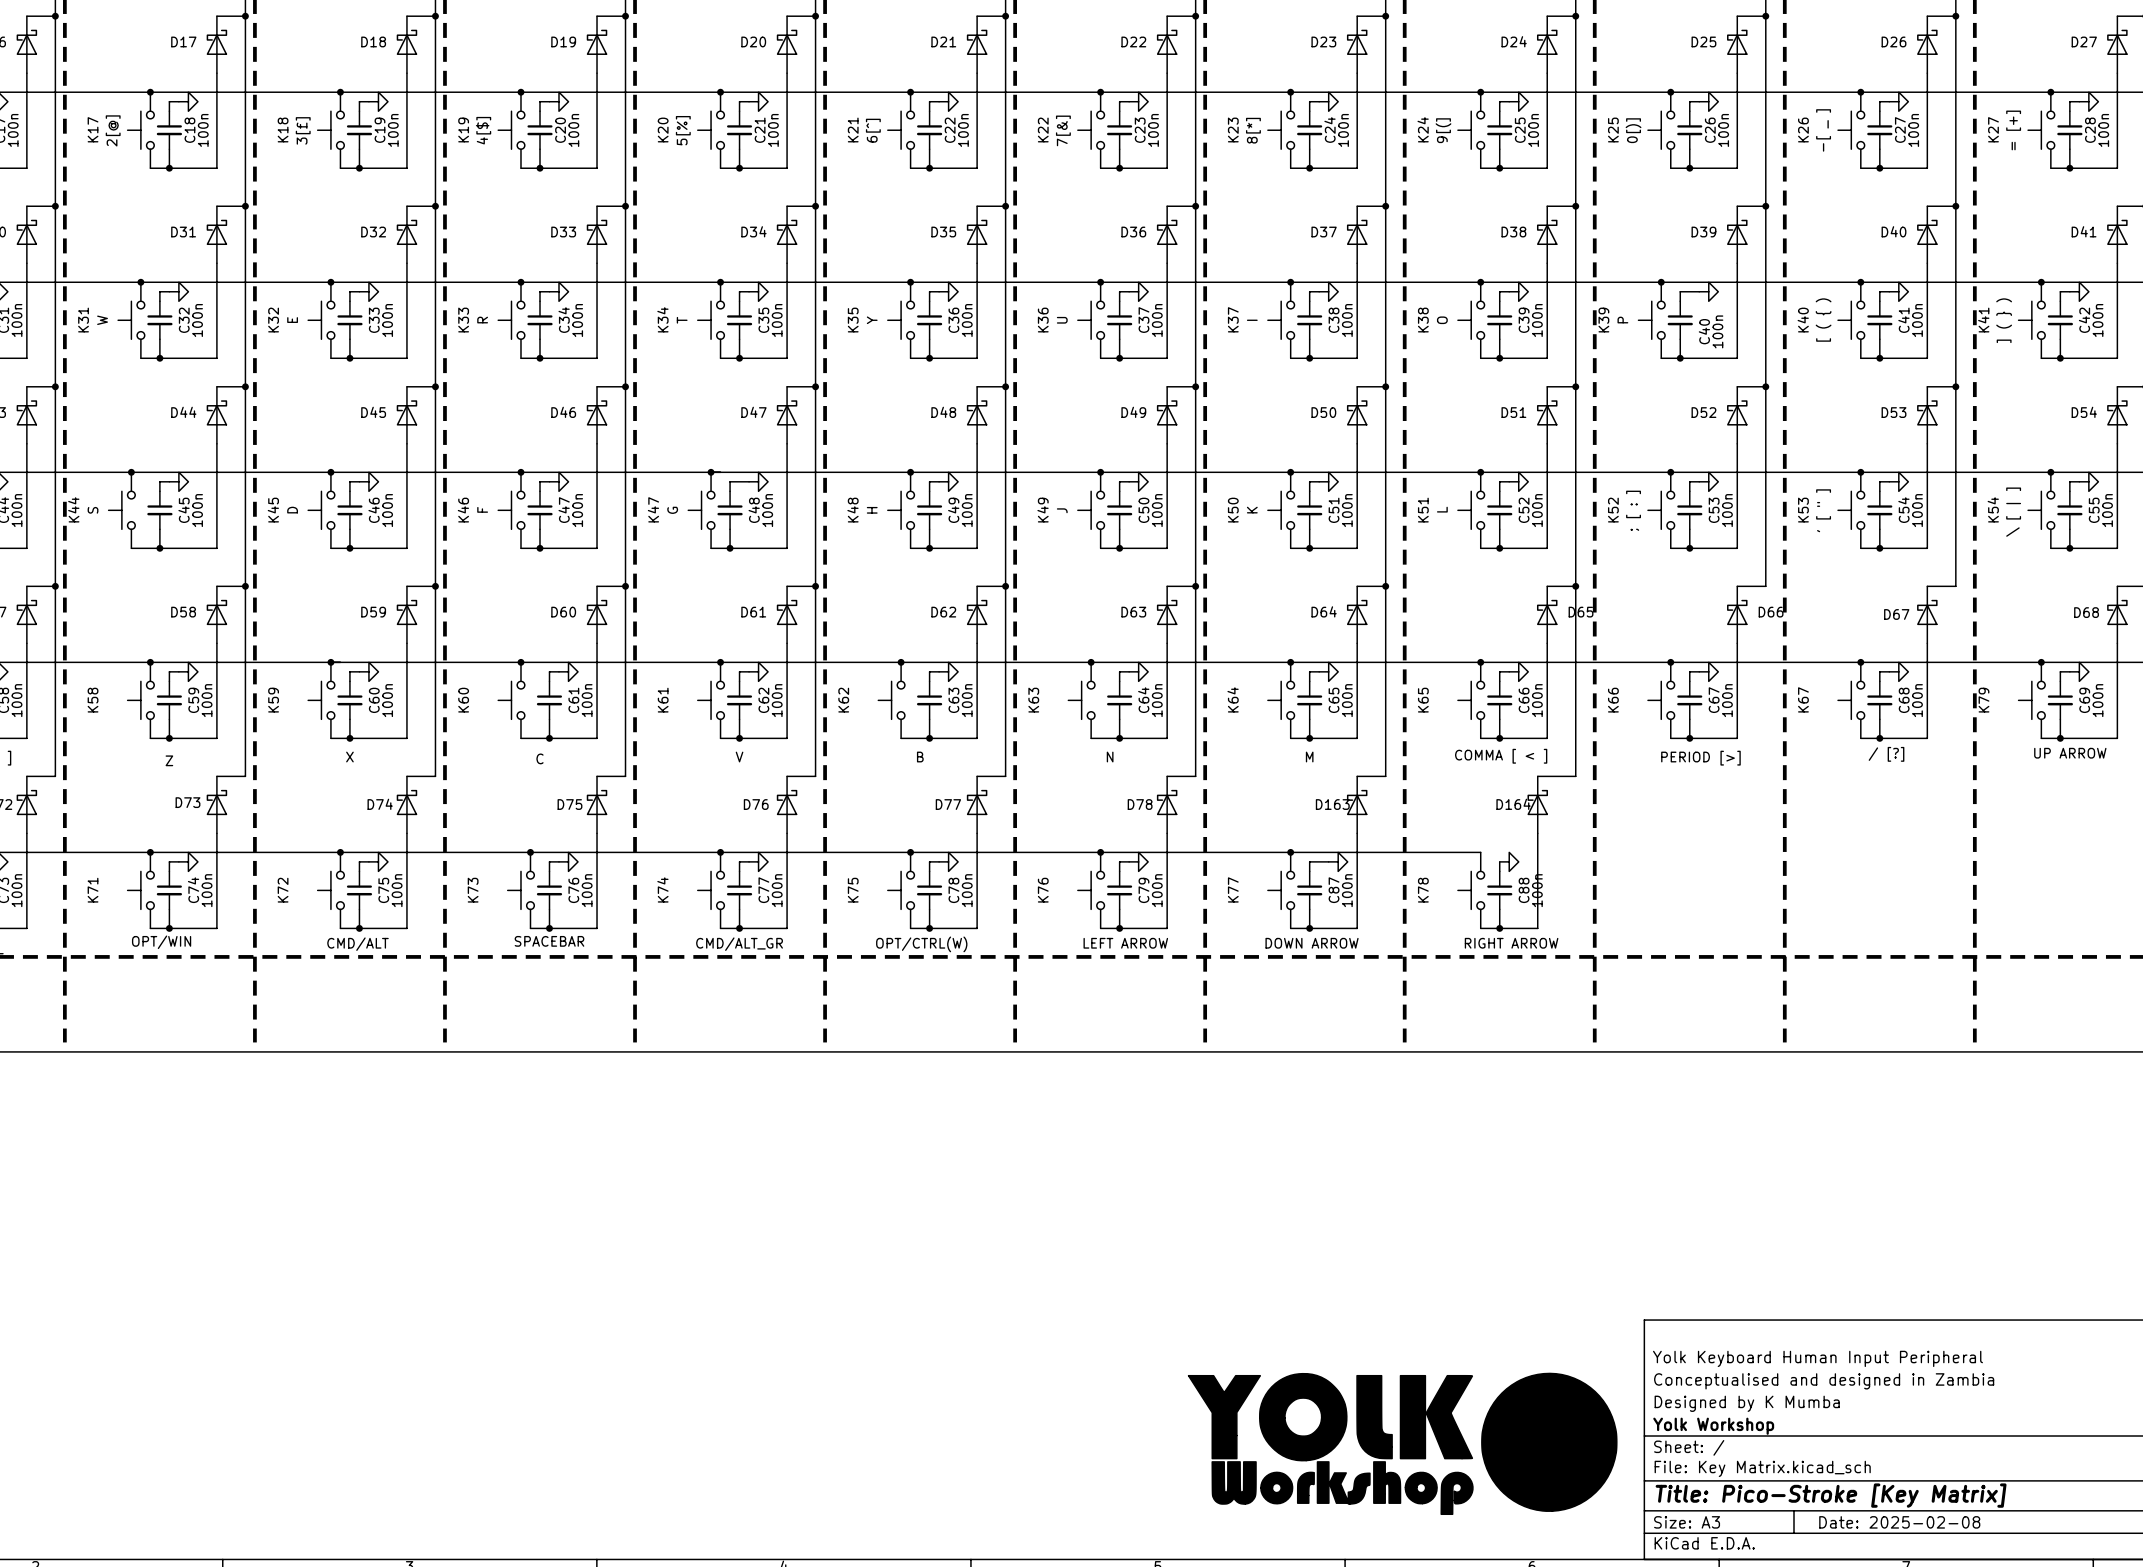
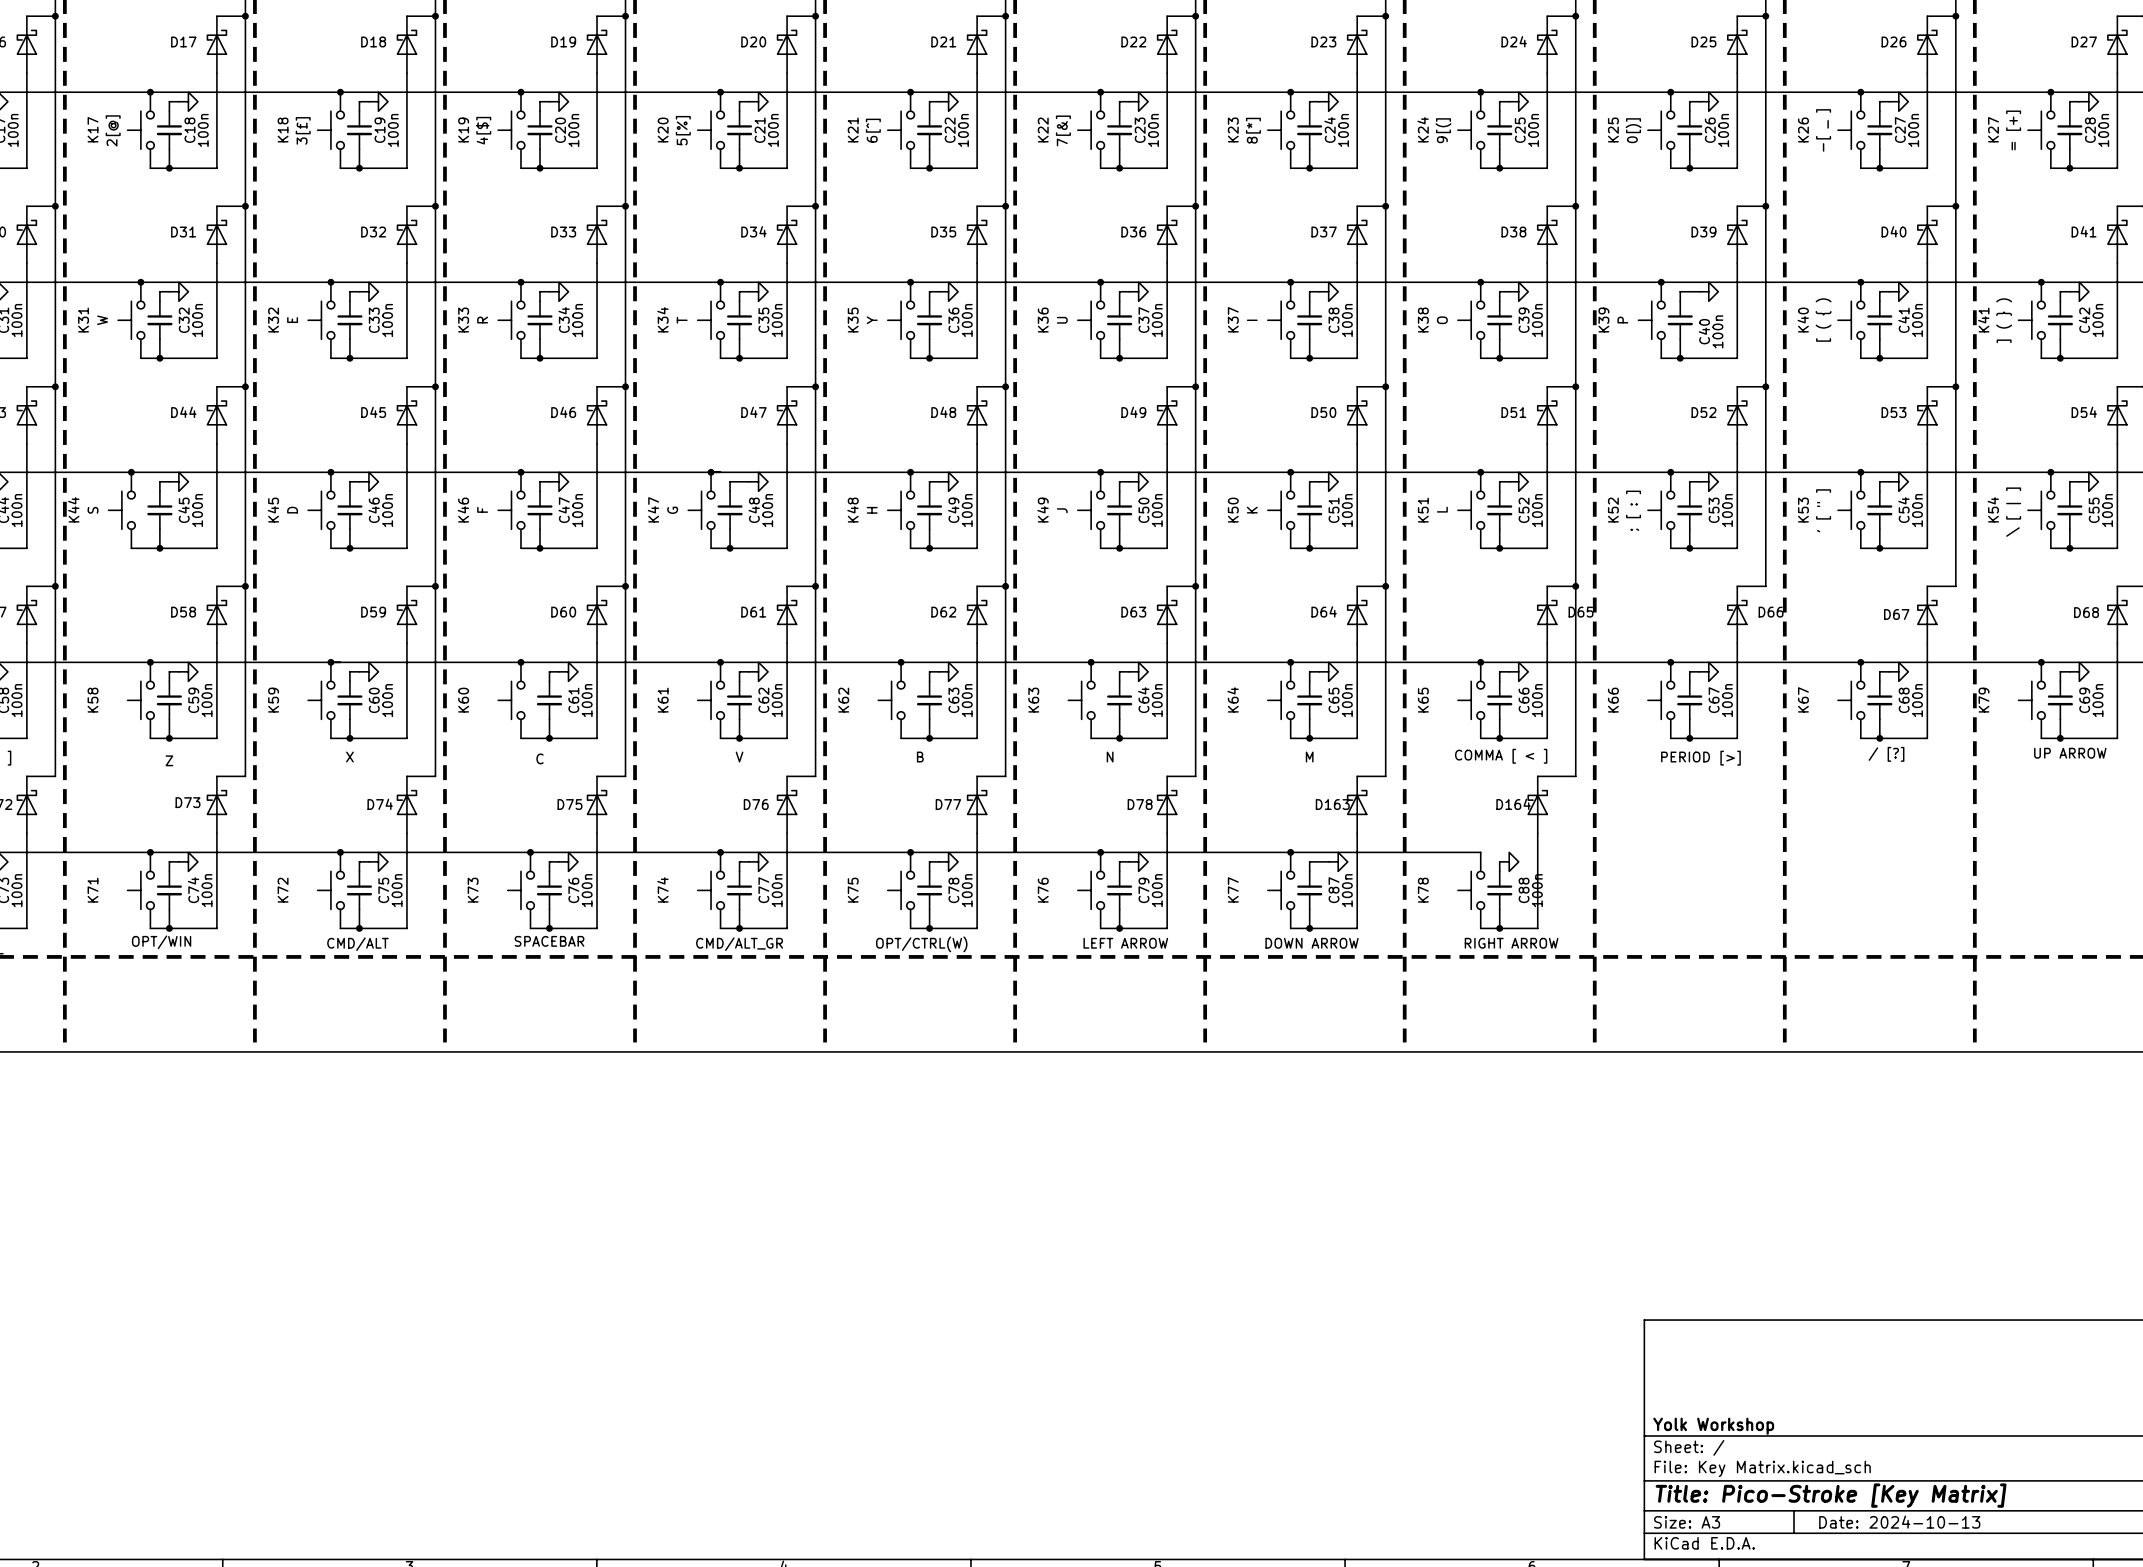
title block: Yolk Keyboard Human Input Peripheral (1817, 1358) -> none
title block: Conceptualised and designed in Zambia (1824, 1381) -> none
title block: Designed by K Mumba (1747, 1403) -> none
power symbol: (1402, 1443) -> none
title block: Date: 2025-02-08 (1899, 1522) -> Date: 2024-10-13 (1899, 1522)

